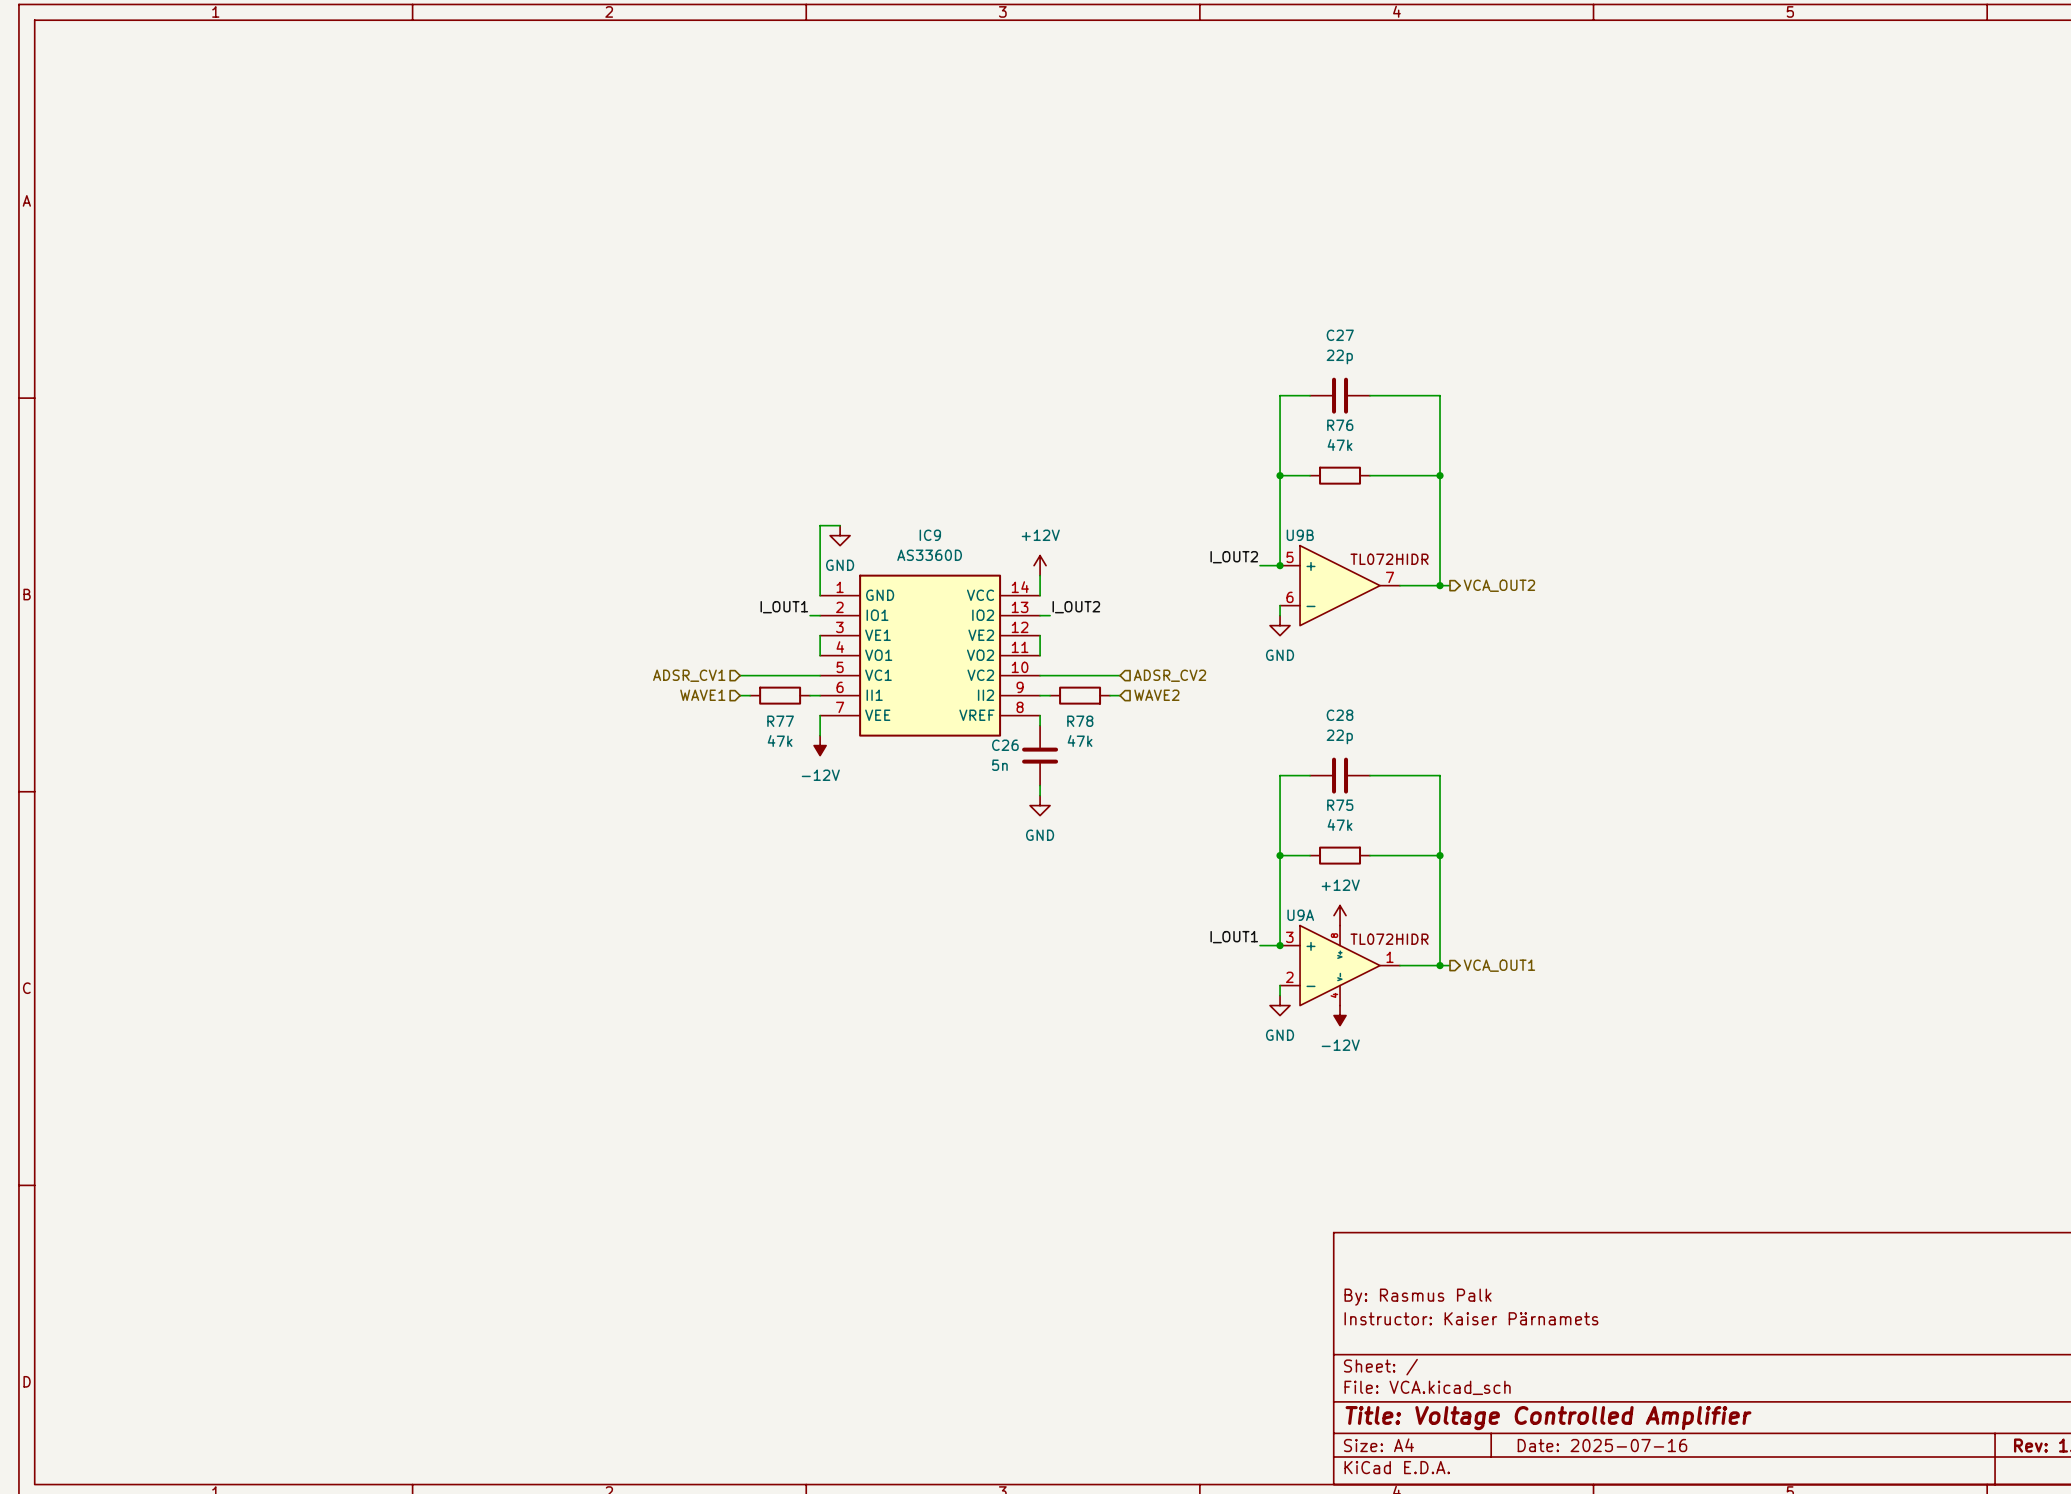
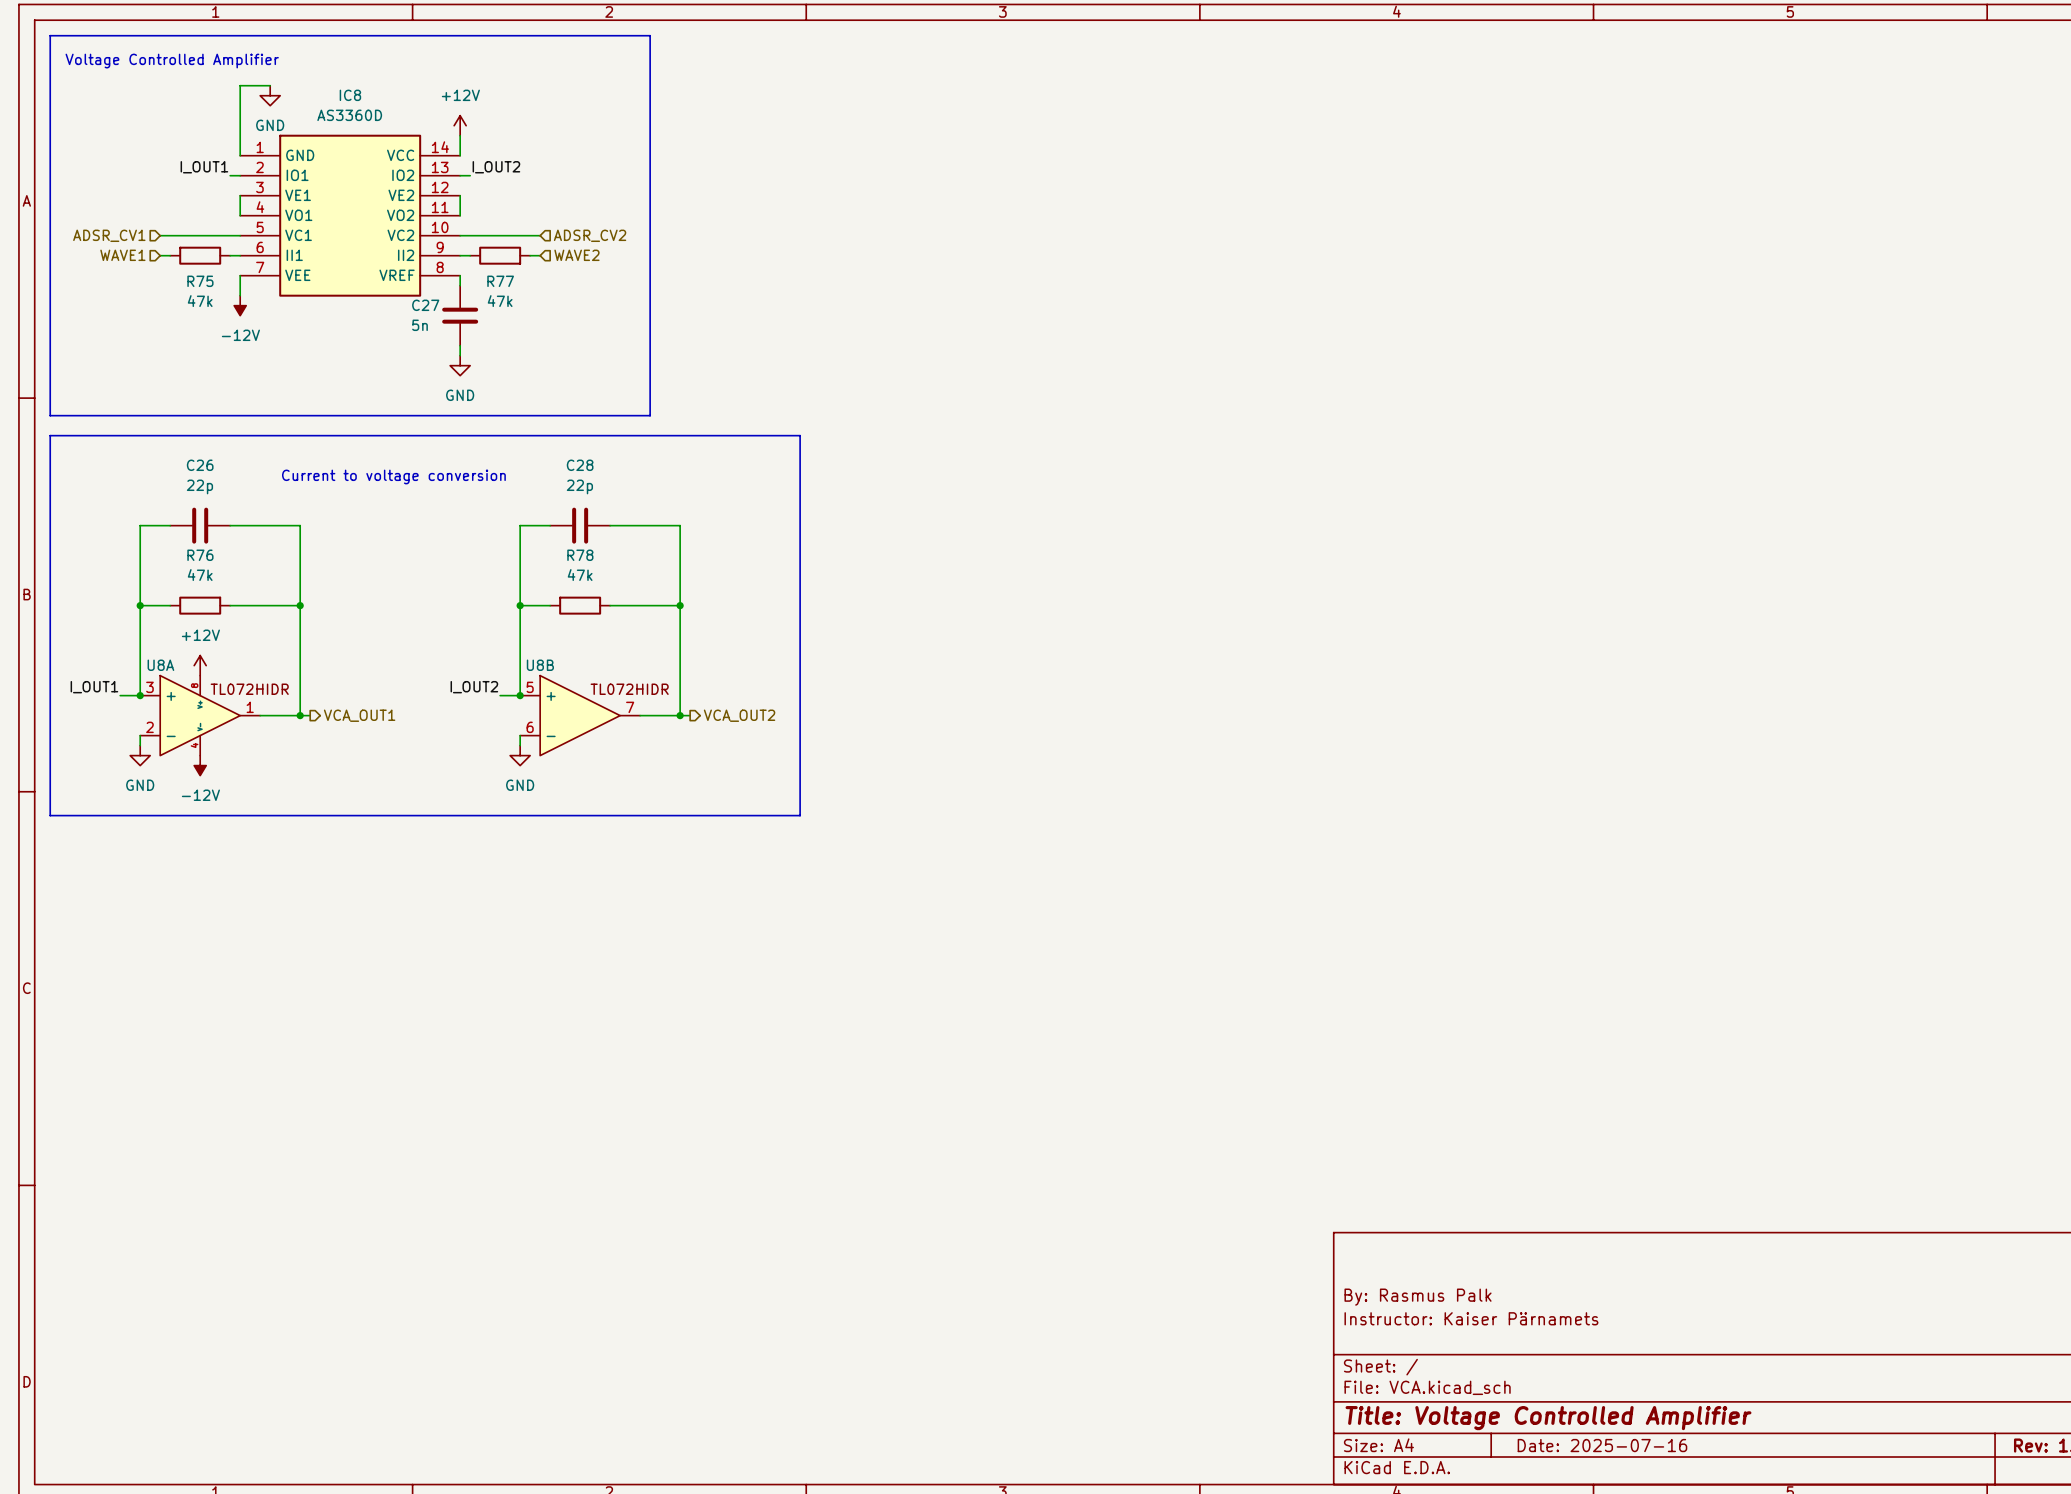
line: none -> (50, 35) (50, 415) (650, 415) (650, 35) (50, 35)
text: none -> Voltage Controlled Amplifier (172, 61)
wire: none -> (270, 85) (240, 85) (240, 155)
power symbol: none -> GND (270, 95)
power symbol: none -> +12V (460, 125)
wire: none -> (460, 135) (460, 155)
label: none -> I_OUT1 (204, 167)
label: none -> I_OUT2 (496, 167)
wire: none -> (230, 175) (240, 175)
wire: none -> (460, 175) (470, 175)
wire: none -> (240, 195) (240, 215)
wire: none -> (460, 195) (460, 215)
IC8: none -> AS3360D (350, 215)
hierarchical label: none -> ADSR_CV1 (109, 235)
wire: none -> (160, 235) (240, 235)
wire: none -> (460, 235) (540, 235)
hierarchical label: none -> ADSR_CV2 (590, 235)
hierarchical label: none -> WAVE1 (122, 255)
wire: none -> (160, 255) (170, 255)
wire: none -> (230, 255) (240, 255)
wire: none -> (460, 255) (470, 255)
wire: none -> (530, 255) (540, 255)
hierarchical label: none -> WAVE2 (576, 255)
wire: none -> (240, 275) (240, 295)
wire: none -> (460, 275) (460, 285)
power symbol: none -> -12V (240, 305)
C27 name position: C27 (1340, 335) -> C27 (425, 305)
wire: none -> (460, 345) (460, 355)
C27 value: 22p (1339, 356) -> 5n (420, 325)
power symbol: none -> GND (460, 365)
wire: (1310, 395) (1280, 395) (1280, 565) (1260, 565) -> none
C27 rotation: 0° (1340, 395) -> 90° clockwise (460, 315)
C27 position: (1340, 395) -> (460, 315)
wire: (1370, 395) (1440, 395) (1440, 585) -> none
line: none -> (50, 435) (800, 435) (800, 815) (50, 815) (50, 435)
wire: (1280, 475) (1310, 475) -> none
junction: (1280, 475) -> none
R76 position: (1340, 475) -> (200, 605)
wire: (1370, 475) (1440, 475) -> none
junction: (1440, 475) -> none
text: none -> Current to voltage conversion (393, 476)
wire: none -> (170, 525) (140, 525) (140, 695) (120, 695)
wire: none -> (230, 525) (300, 525) (300, 715)
wire: none -> (550, 525) (520, 525) (520, 695) (500, 695)
wire: none -> (610, 525) (680, 525) (680, 715)
wire: (840, 525) (820, 525) (820, 595) -> none
power symbol: GND (840, 535) -> none
label: I_OUT2 (1234, 557) -> none
power symbol: +12V (1040, 565) -> none
junction: (1280, 565) -> none
wire: (1040, 575) (1040, 595) -> none
U9B: (1340, 585) -> none
wire: (1400, 585) (1450, 585) -> none
junction: (1440, 585) -> none
hierarchical label: VCA_OUT2 (1499, 585) -> none
wire: none -> (140, 605) (170, 605)
junction: none -> (140, 605)
wire: none -> (230, 605) (300, 605)
junction: none -> (300, 605)
wire: none -> (520, 605) (550, 605)
junction: none -> (520, 605)
wire: none -> (610, 605) (680, 605)
junction: none -> (680, 605)
wire: (1280, 605) (1280, 615) -> none
label: I_OUT1 (784, 607) -> none
label: I_OUT2 (1076, 607) -> none
wire: (810, 615) (820, 615) -> none
wire: (1040, 615) (1050, 615) -> none
power symbol: GND (1280, 625) -> none
wire: (820, 635) (820, 655) -> none
wire: (1040, 635) (1040, 655) -> none
IC9: AS3360D (930, 655) -> none
power symbol: none -> +12V (200, 665)
hierarchical label: ADSR_CV1 (689, 675) -> none
wire: (740, 675) (820, 675) -> none
wire: (1040, 675) (1120, 675) -> none
hierarchical label: ADSR_CV2 (1169, 675) -> none
label: none -> I_OUT1 (94, 687)
label: none -> I_OUT2 (474, 687)
junction: none -> (140, 695)
junction: none -> (520, 695)
hierarchical label: WAVE1 (702, 695) -> none
wire: (740, 695) (750, 695) -> none
R77 position: (780, 695) -> (500, 255)
wire: (810, 695) (820, 695) -> none
wire: (1040, 695) (1050, 695) -> none
R78 position: (1080, 695) -> (580, 605)
wire: (1110, 695) (1120, 695) -> none
hierarchical label: WAVE2 (1156, 695) -> none
U8A: none -> (200, 715)
wire: none -> (260, 715) (310, 715)
junction: none -> (300, 715)
hierarchical label: none -> VCA_OUT1 (359, 715)
U8B: none -> (580, 715)
wire: none -> (640, 715) (690, 715)
junction: none -> (680, 715)
hierarchical label: none -> VCA_OUT2 (739, 715)
wire: (820, 715) (820, 735) -> none
wire: (1040, 715) (1040, 725) -> none
R78 name position: R78 (1080, 721) -> R78 (580, 555)
wire: none -> (140, 735) (140, 745)
wire: none -> (520, 735) (520, 745)
R78 value position: 47k (1080, 741) -> 47k (580, 575)
power symbol: -12V (820, 745) -> none
C26 name position: C26 (1005, 745) -> C26 (200, 465)
power symbol: none -> GND (140, 755)
power symbol: none -> GND (520, 755)
C26 rotation: 0° (1040, 755) -> 90° clockwise (200, 525)
C26 position: (1040, 755) -> (200, 525)
power symbol: none -> -12V (200, 765)
C26 value: 5n (999, 765) -> 22p (199, 486)
wire: (1310, 775) (1280, 775) (1280, 945) (1260, 945) -> none
C28 position: (1340, 775) -> (580, 525)
wire: (1370, 775) (1440, 775) (1440, 965) -> none
wire: (1040, 785) (1040, 795) -> none
power symbol: GND (1040, 805) -> none
R75 name position: R75 (1340, 805) -> R75 (200, 281)
R75 value position: 47k (1340, 824) -> 47k (200, 301)
wire: (1280, 855) (1310, 855) -> none
junction: (1280, 855) -> none
R75 position: (1340, 855) -> (200, 255)
wire: (1370, 855) (1440, 855) -> none
junction: (1440, 855) -> none
power symbol: +12V (1340, 915) -> none
label: I_OUT1 (1234, 937) -> none
junction: (1280, 945) -> none
U9A: (1340, 965) -> none
wire: (1400, 965) (1450, 965) -> none
junction: (1440, 965) -> none
hierarchical label: VCA_OUT1 (1499, 965) -> none
wire: (1280, 985) (1280, 995) -> none
power symbol: GND (1280, 1005) -> none
power symbol: -12V (1340, 1015) -> none

